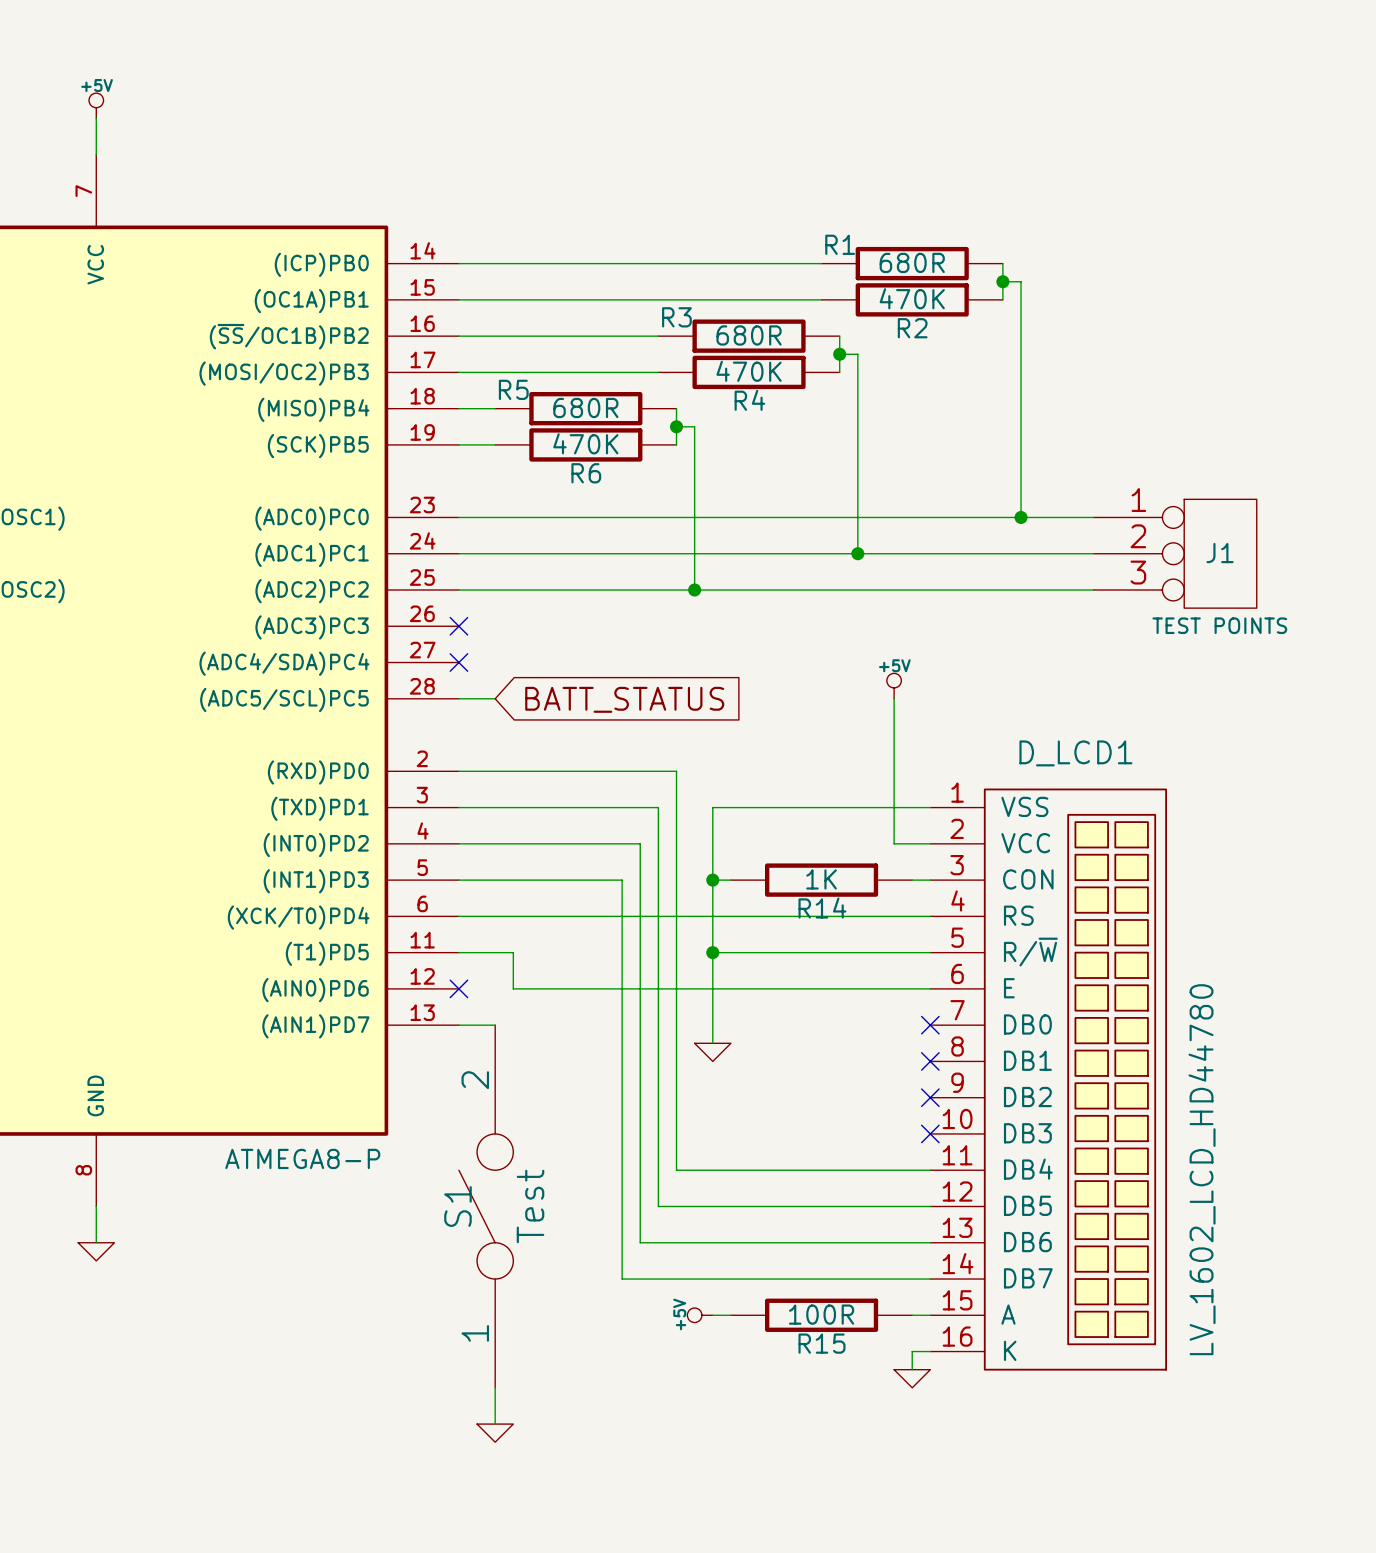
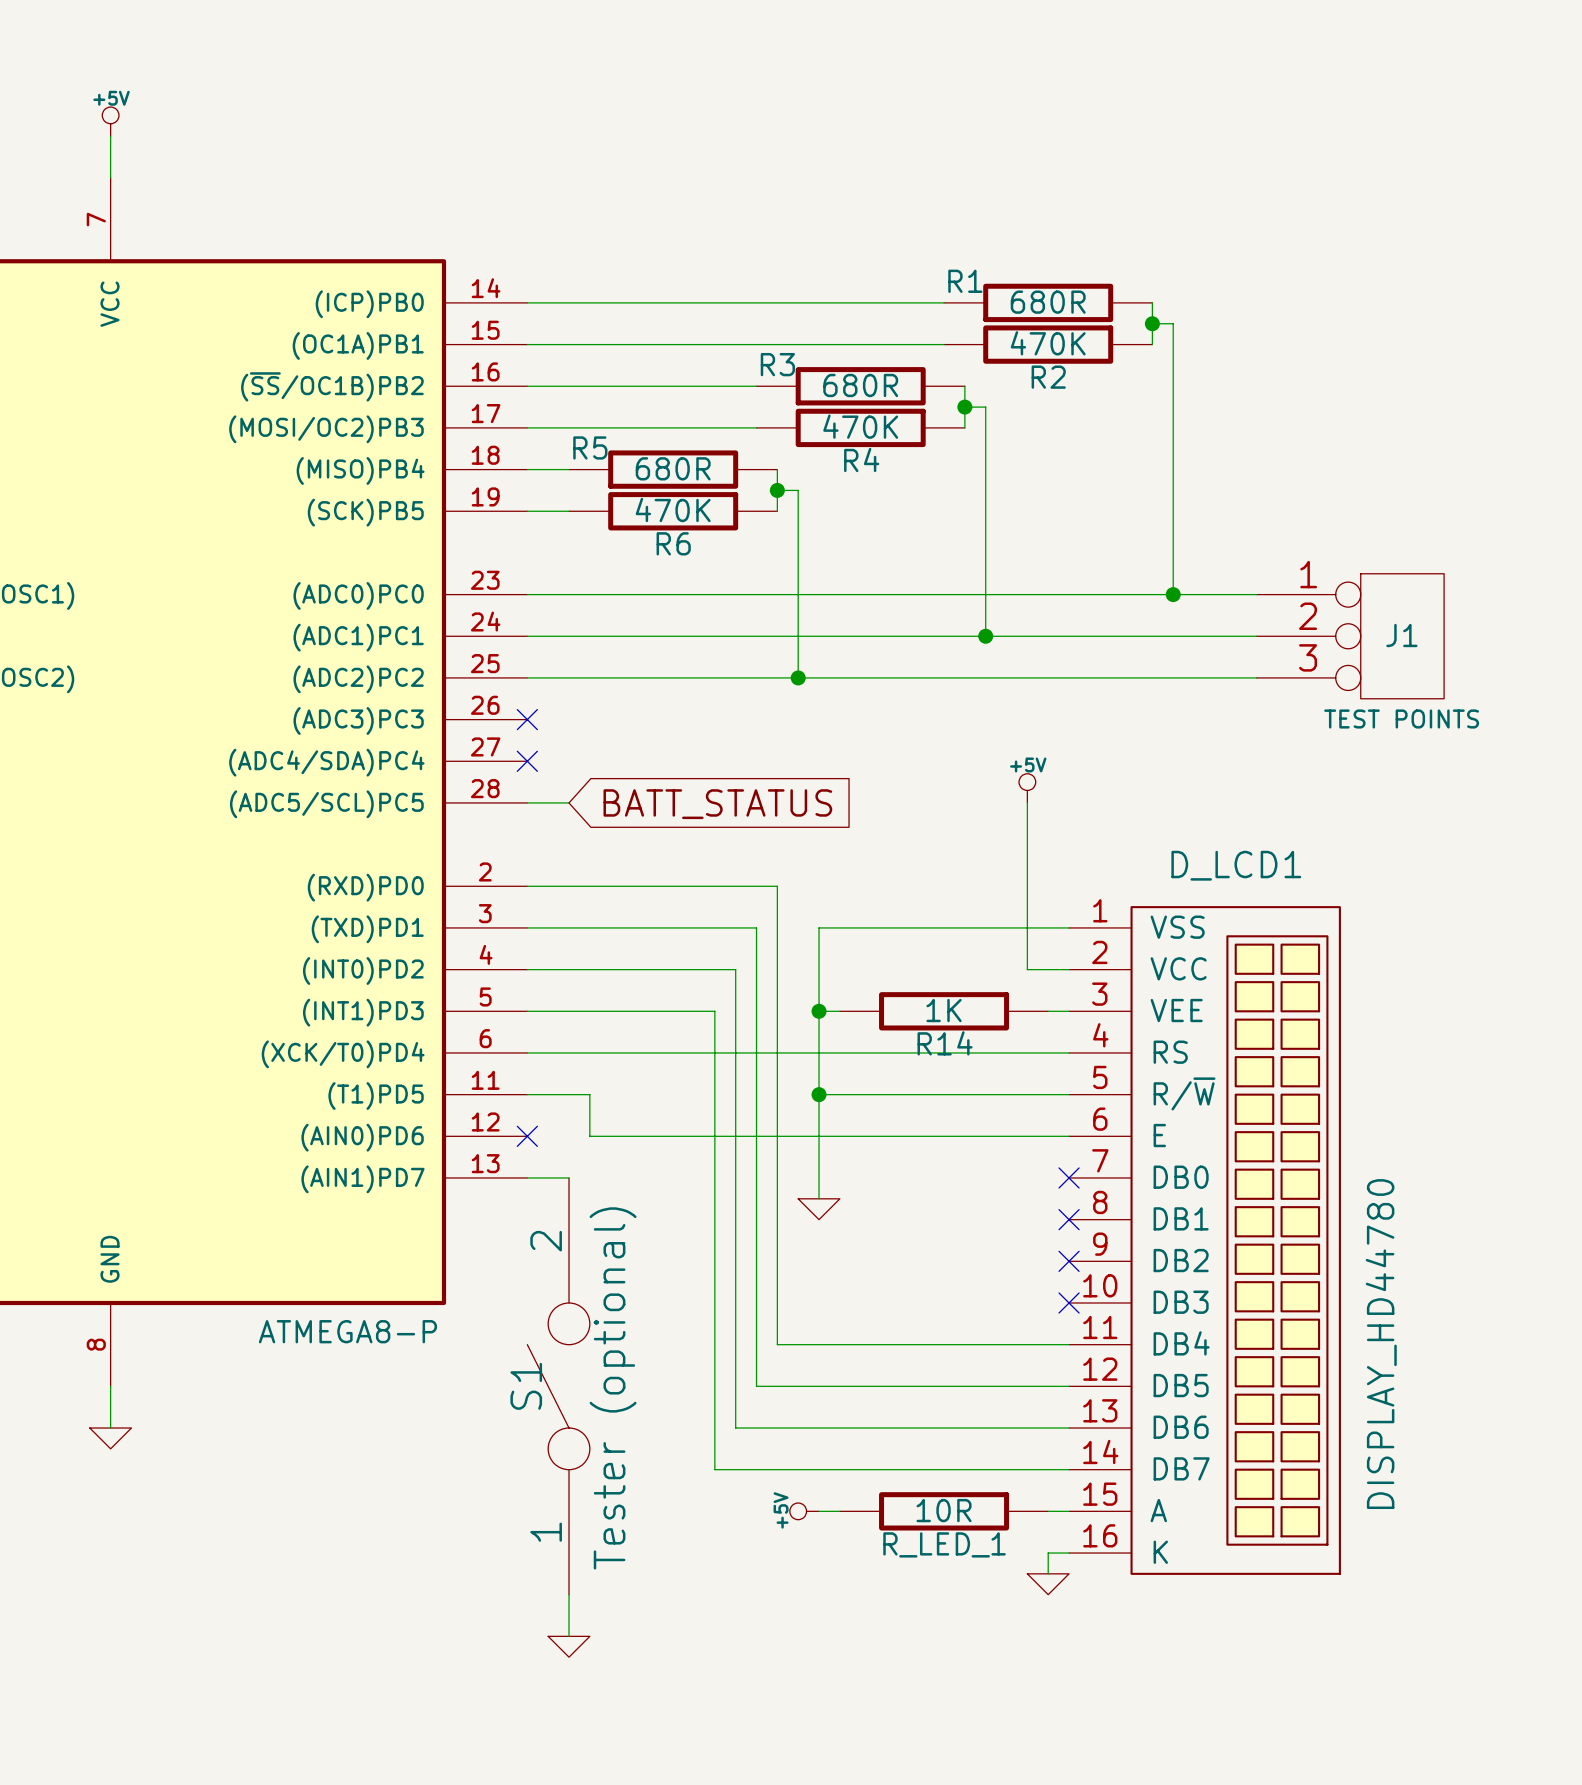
D_LCD1 pin name: CON (1028, 879) -> VEE (1176, 1010)
D_LCD1 value: LV_1602_LCD_HD44780 (1202, 1169) -> DISPLAY_HD44780 (1381, 1344)
S1 value: Test (530, 1206) -> Tester (optional) (613, 1388)
R15 value: 100R (821, 1314) -> 10R (944, 1510)
R15 name: R15 (822, 1343) -> R_LED_1 (944, 1544)

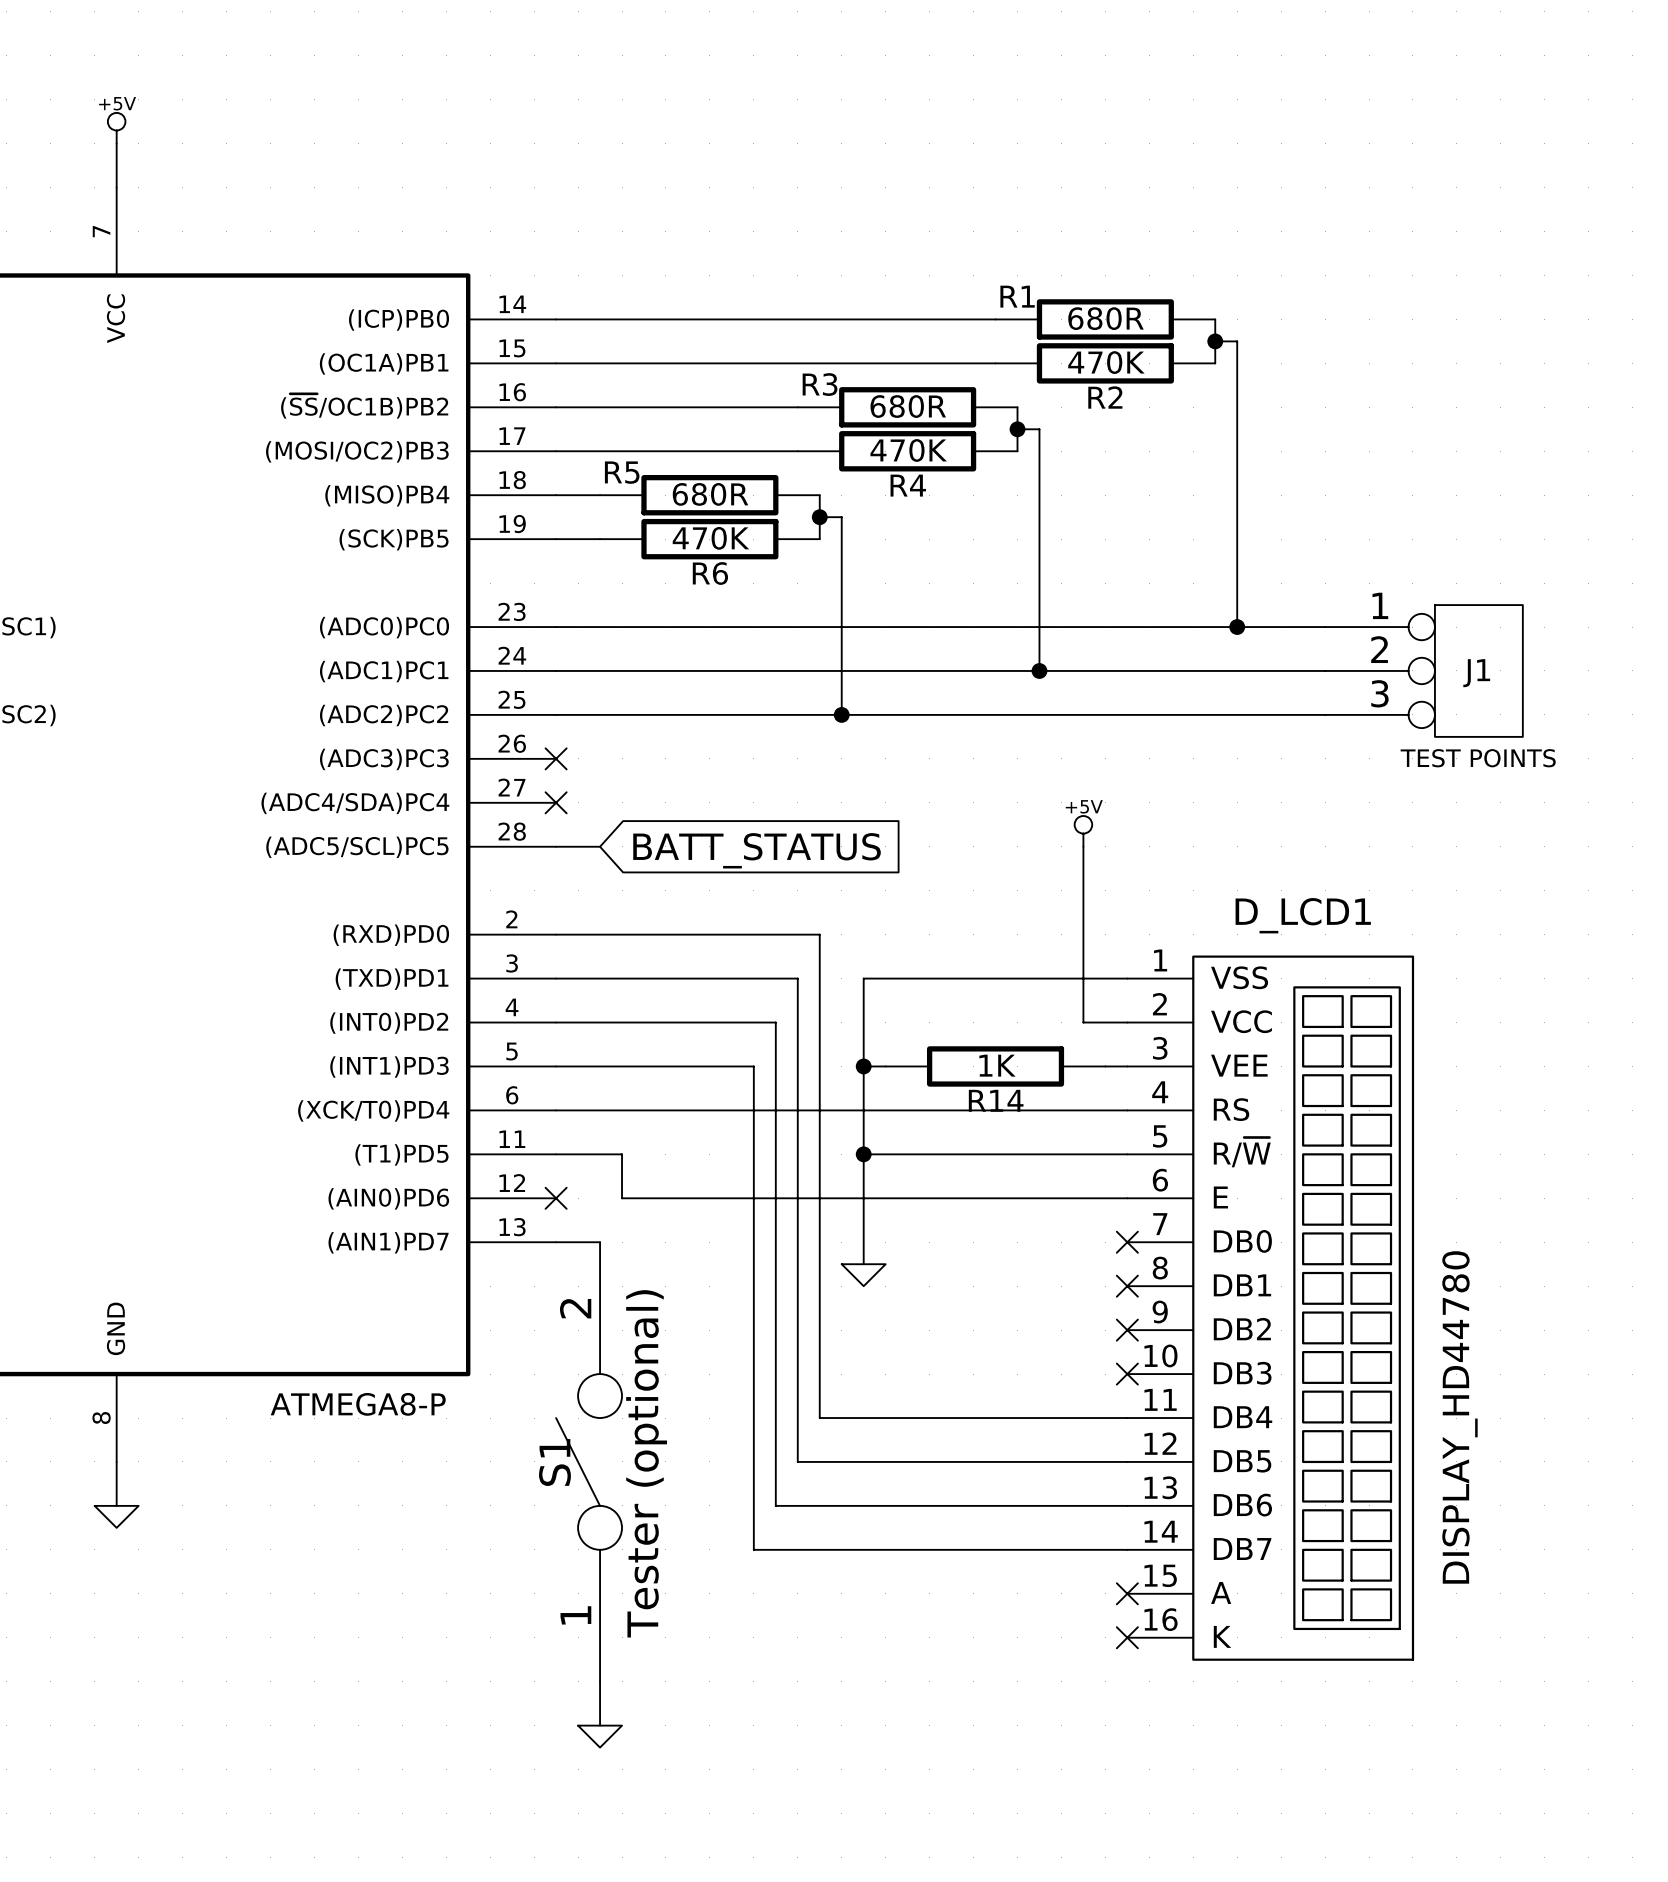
power symbol: +5V (804, 1511) -> none
wire: (819, 1511) (839, 1511) -> none
R_LED_1: 10R (944, 1511) -> none
wire: (1048, 1511) (1069, 1511) -> none
no-connect mark: none -> (1127, 1593)
wire: (1069, 1553) (1048, 1553) (1048, 1573) -> none
no-connect mark: none -> (1127, 1637)
power symbol: (1048, 1584) -> none

